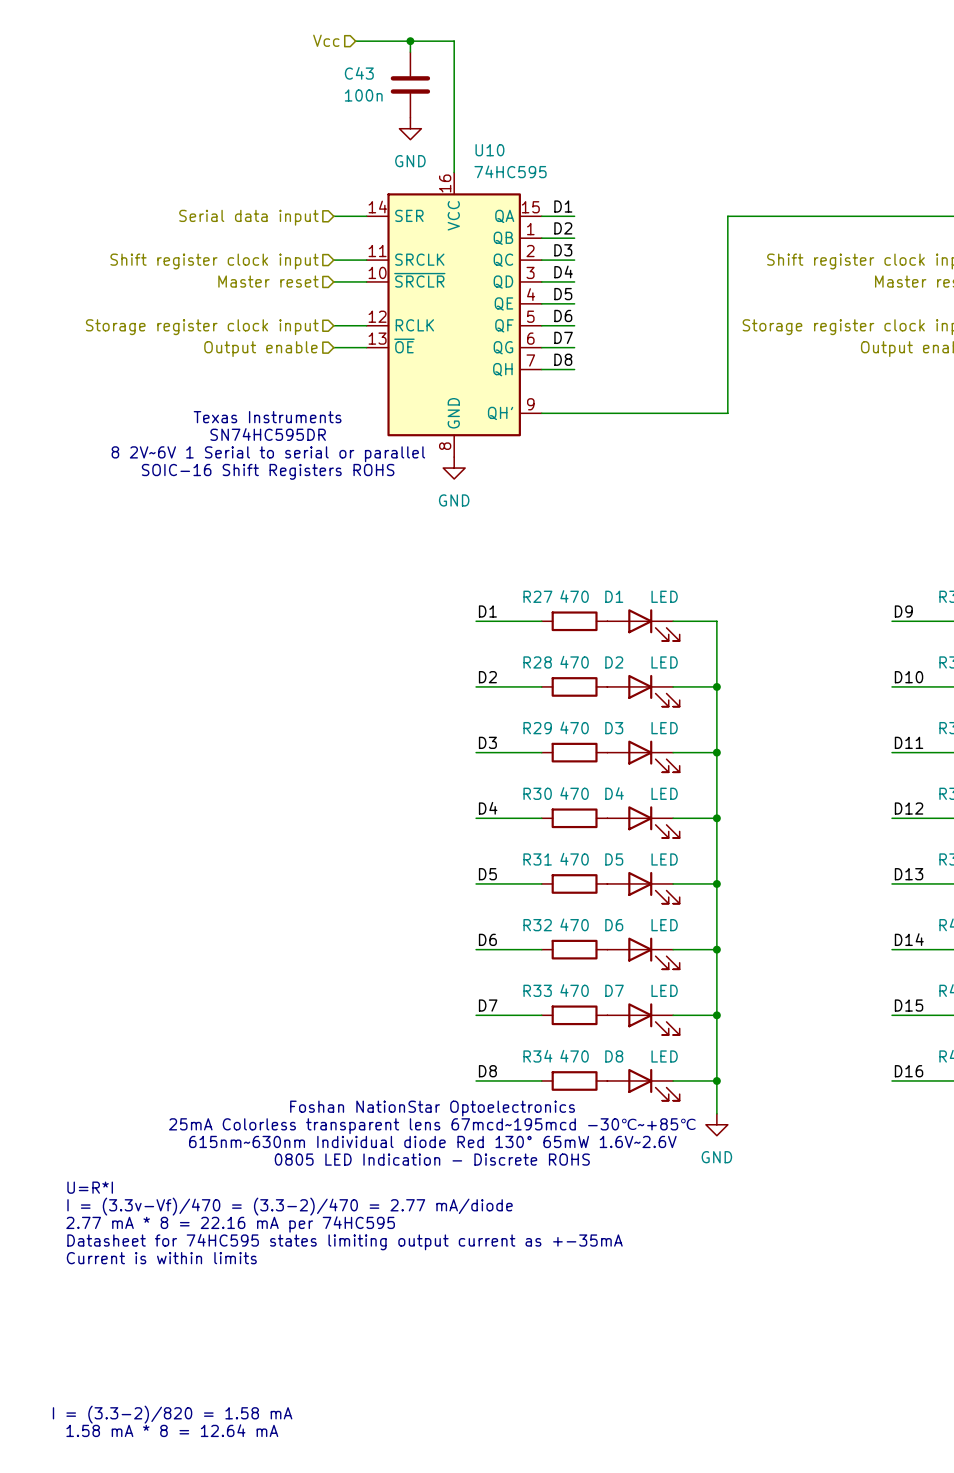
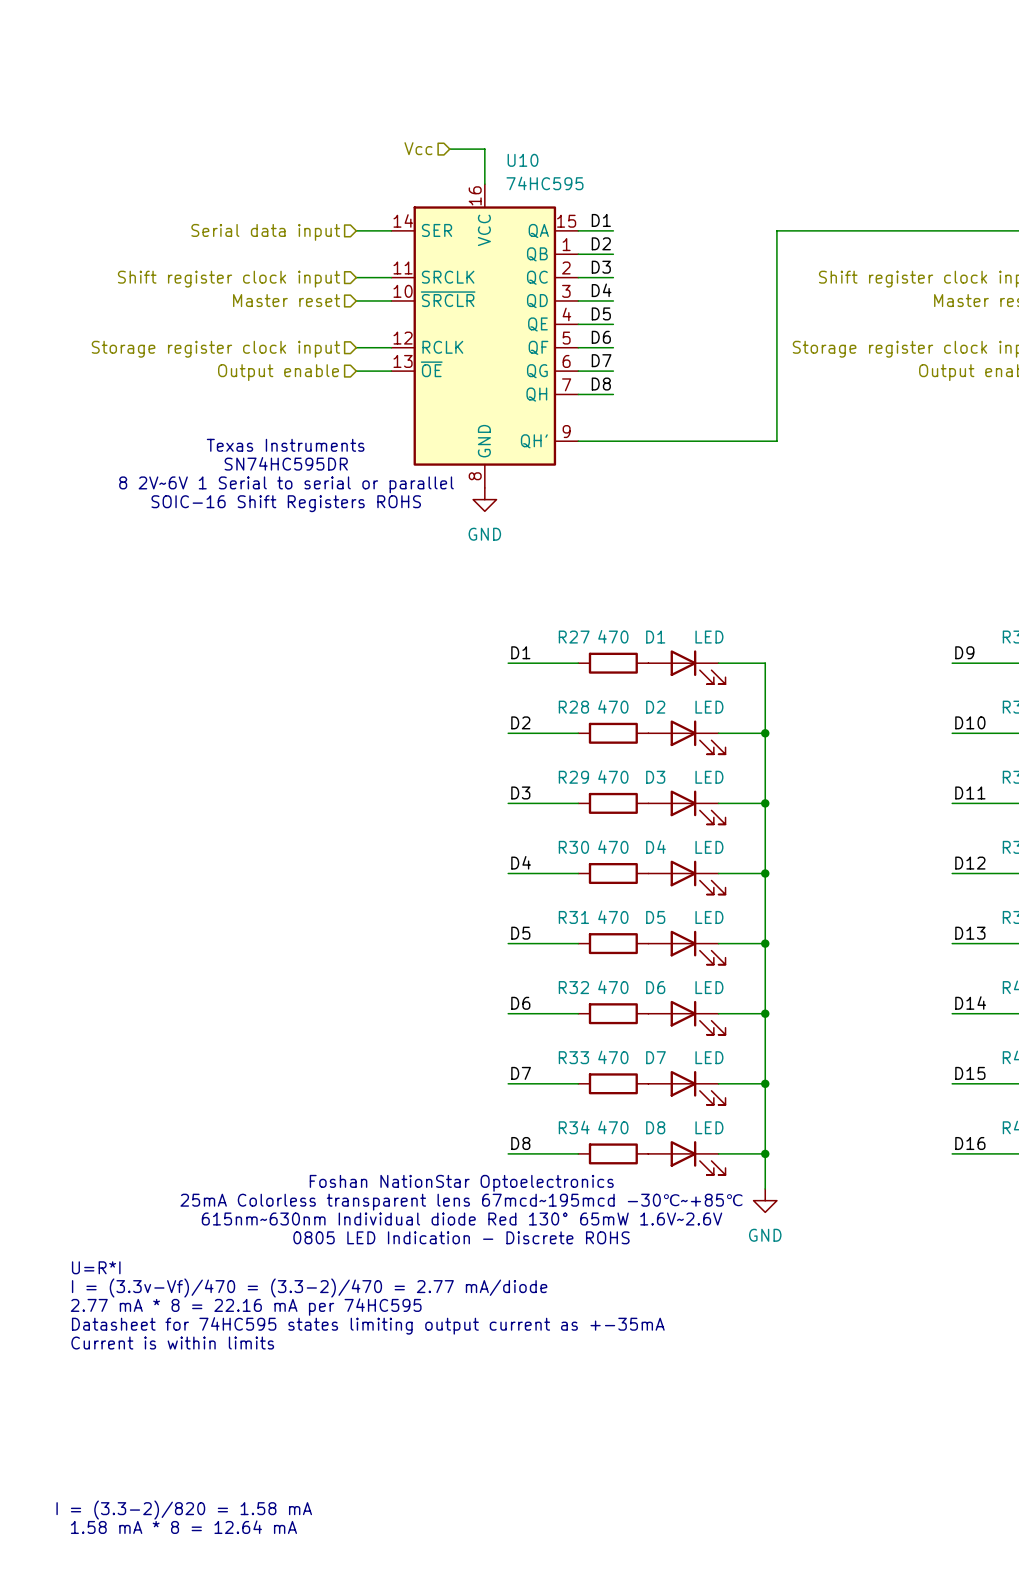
hierarchical label position: Vcc (326, 40) -> Vcc (418, 148)
wire: (355, 41) (454, 41) (454, 139) -> (449, 149) (484, 149)
wire: (410, 41) (410, 52) -> none
junction: (410, 41) -> none
C43: 100n (410, 84) -> none
power symbol: GND (410, 128) -> none

